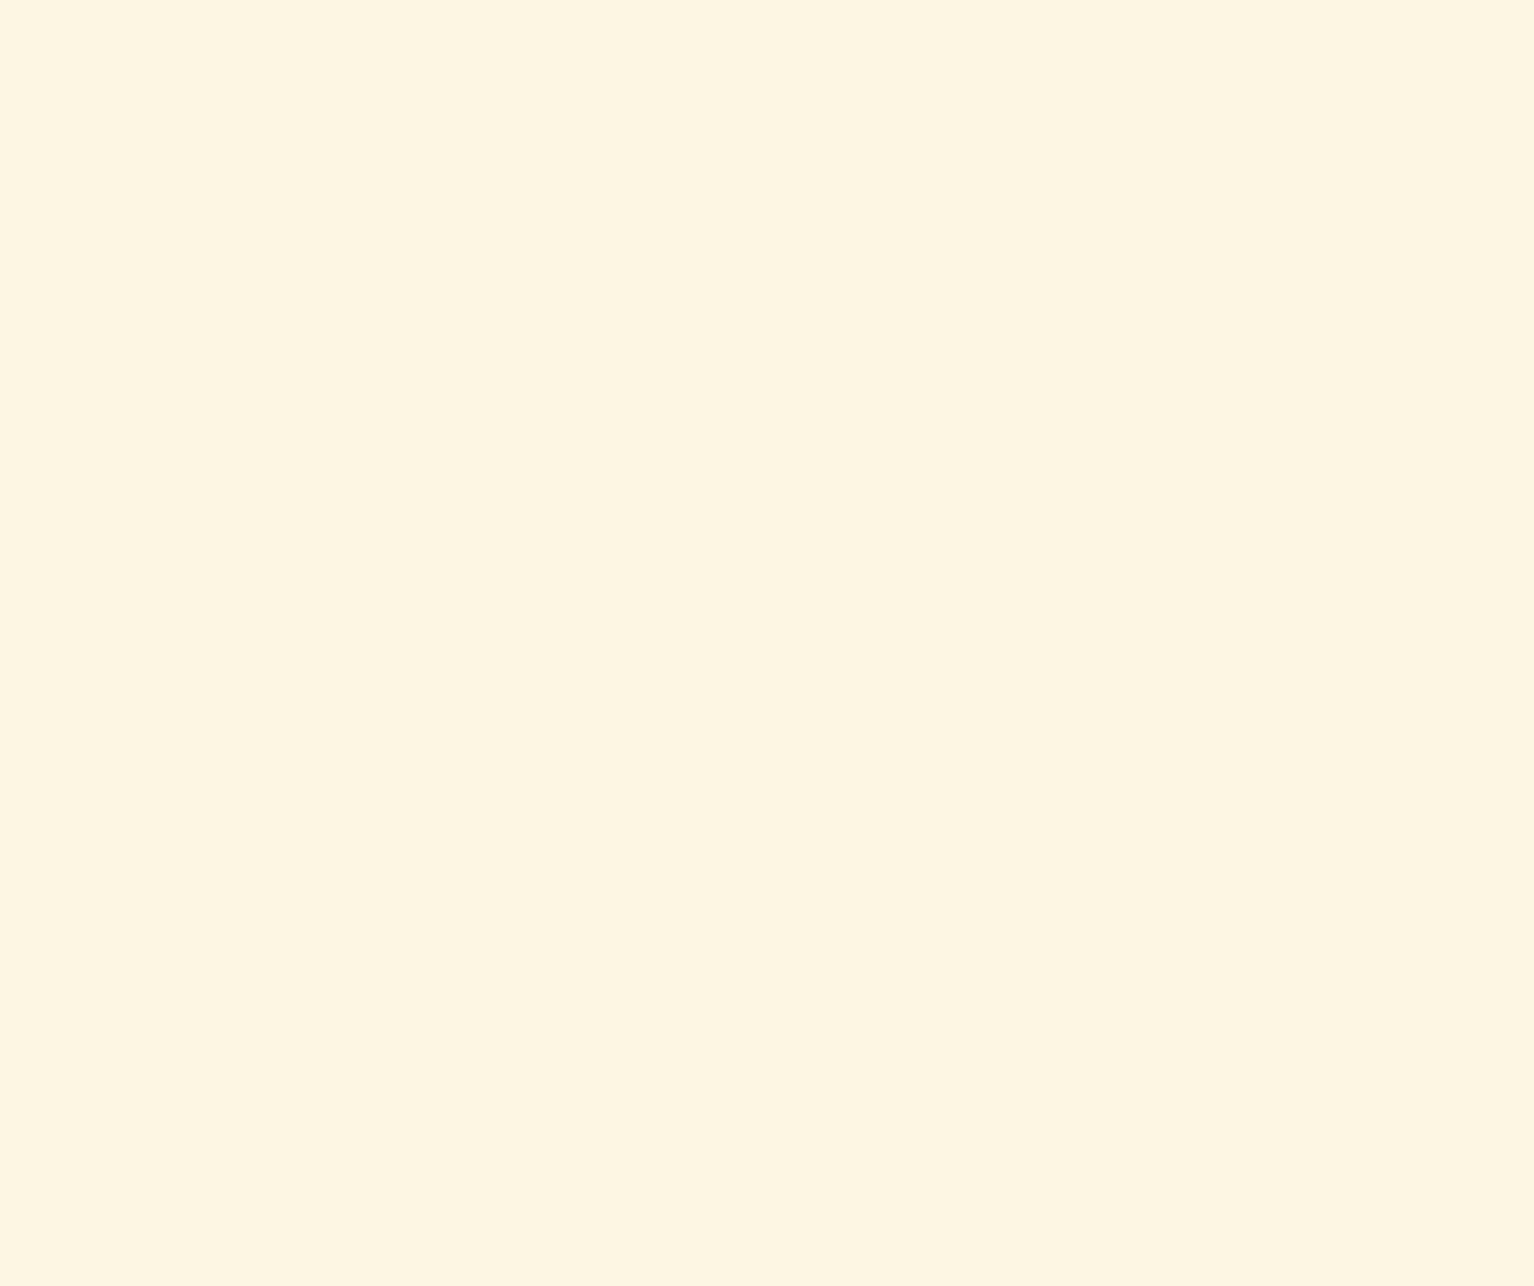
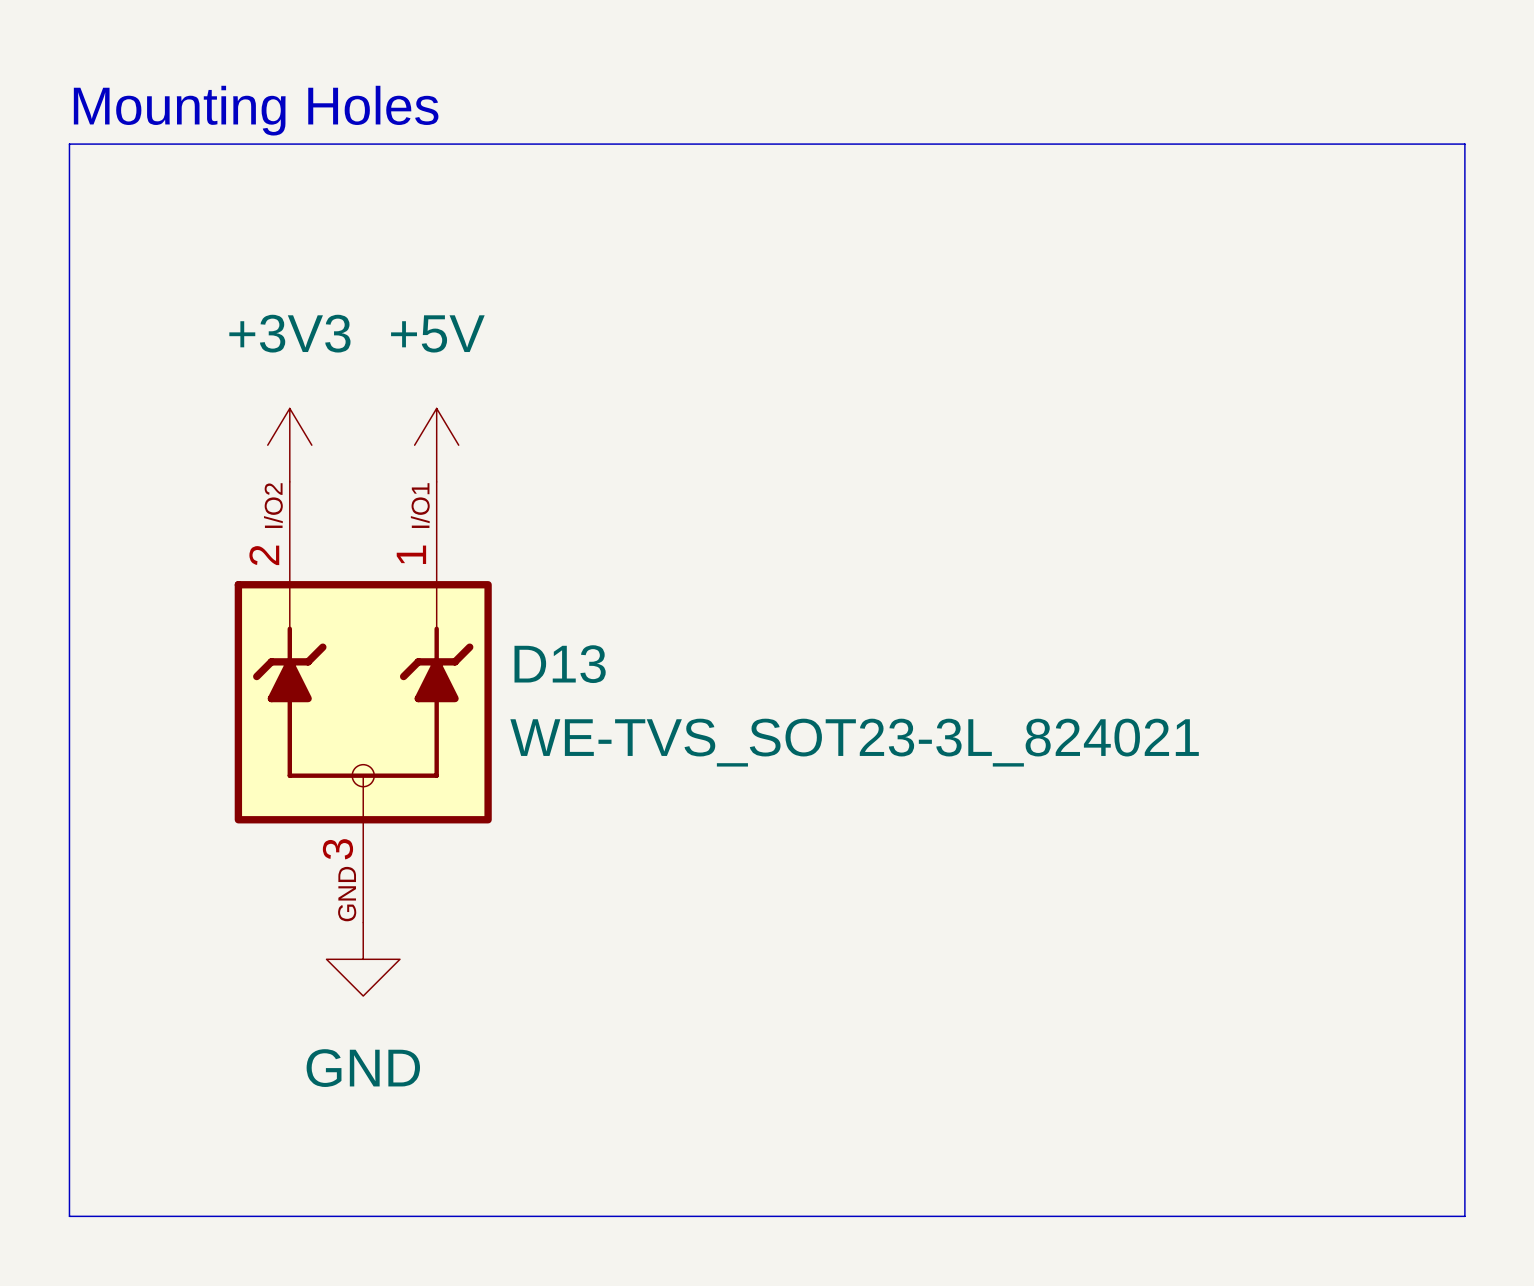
text: none -> Mounting Holes (256, 110)
line: none -> (69, 144) (1464, 144) (1464, 1216) (69, 1216) (69, 144)
power symbol: none -> +3V3 (289, 445)
power symbol: none -> +5V (436, 445)
D13: none -> WE-TVS_SOT23-3L_824021 (363, 702)
power symbol: none -> GND (363, 959)

